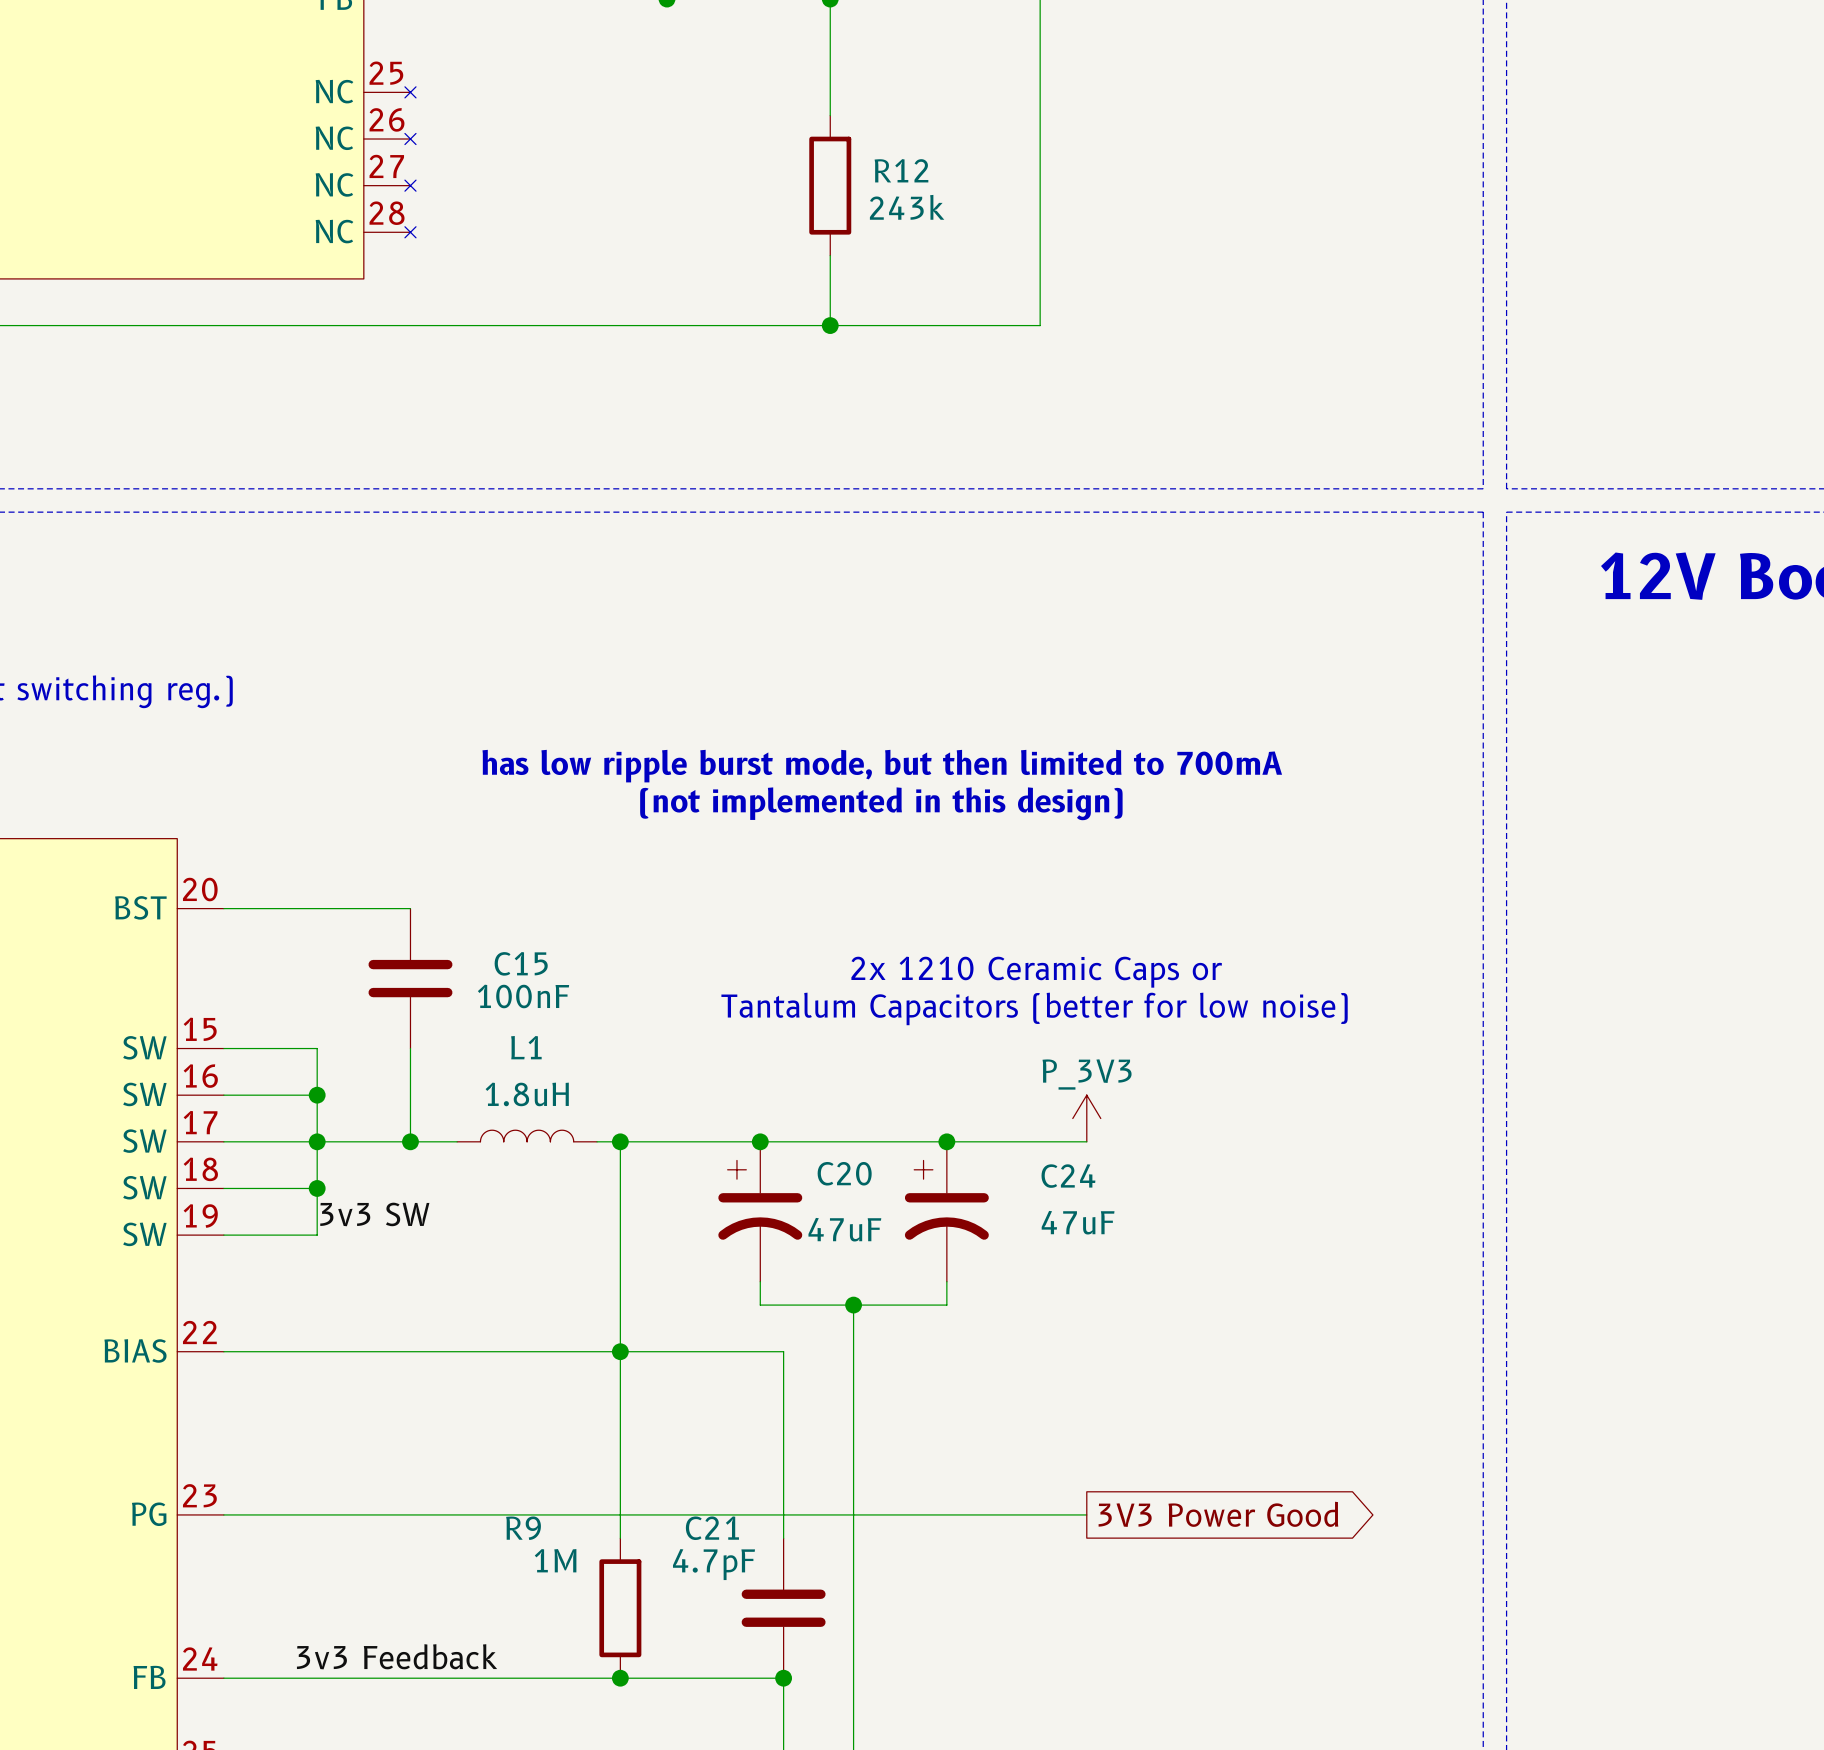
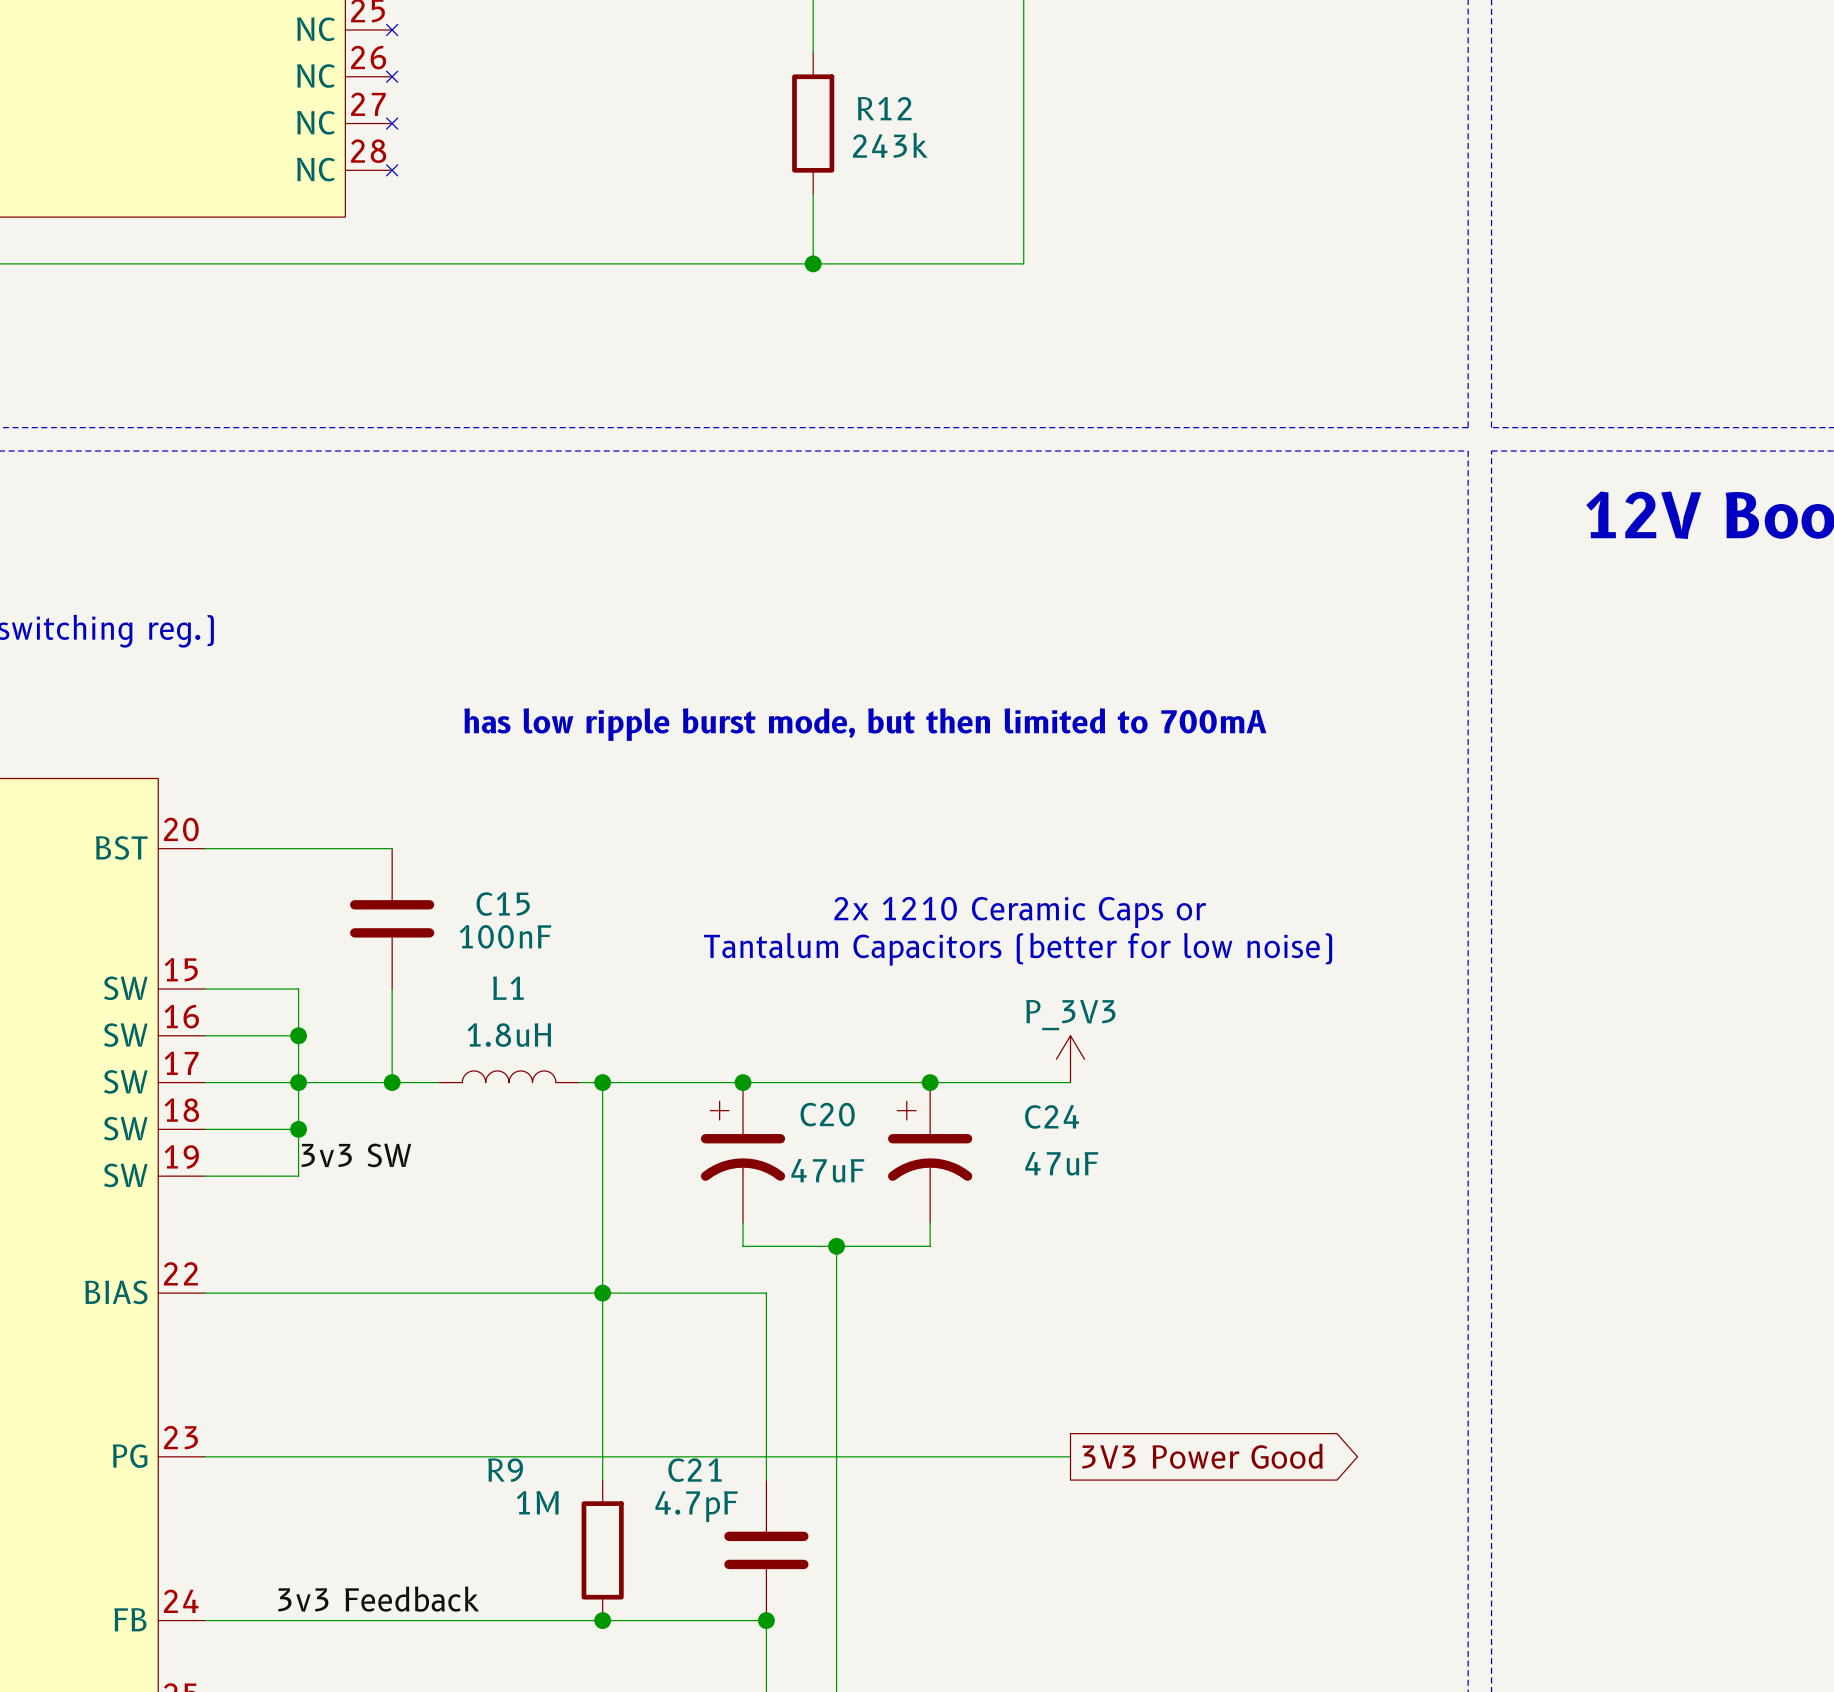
text position: has low ripple burst mode, but then limited to 700mA (882, 766) -> has low ripple burst mode, but then limited to 700mA (865, 724)
text: (not implemented in this design) (881, 803) -> none

